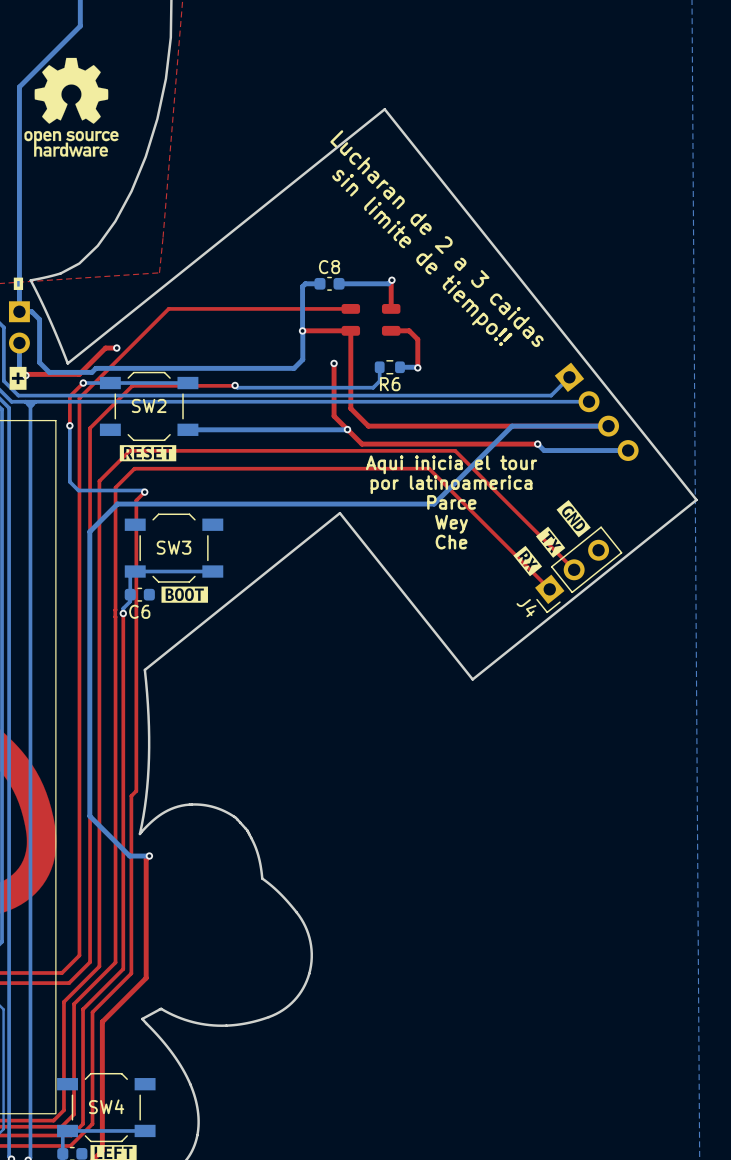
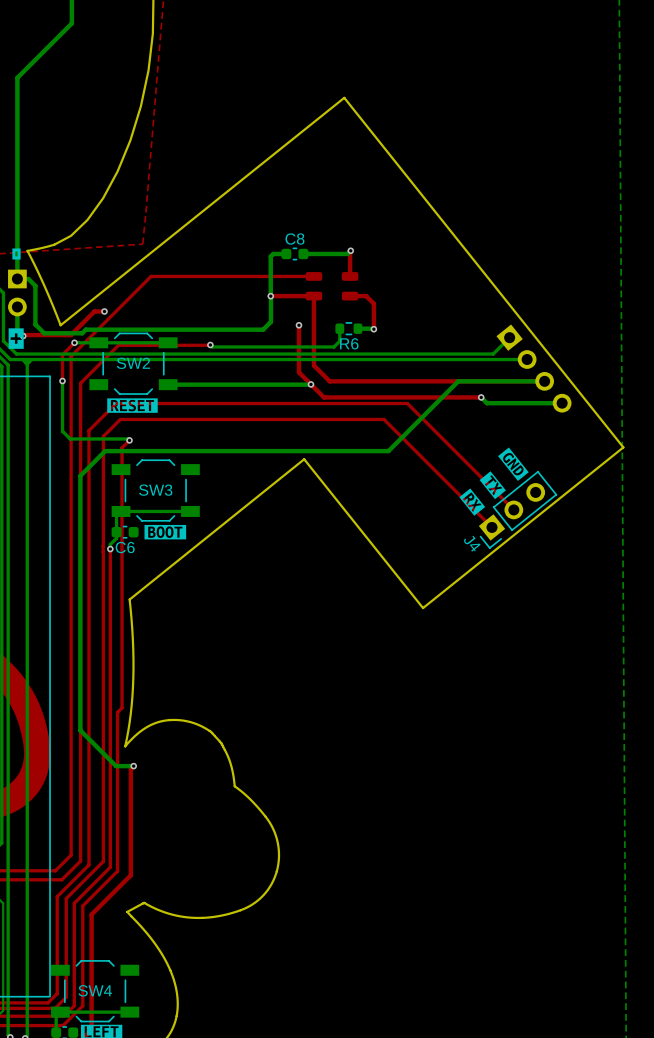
drawing: [24, 57, 119, 157] -> none
text: Lucharan de 2 a 3 caidas (437, 238) -> none
text: sin limite de tiempo!! (422, 257) -> none
text: Aqui inicia el tour (451, 464) -> none
text: por latinoamerica (451, 484) -> none
text: Parce (451, 502) -> none
text: Wey (451, 524) -> none
text: Che (451, 542) -> none

